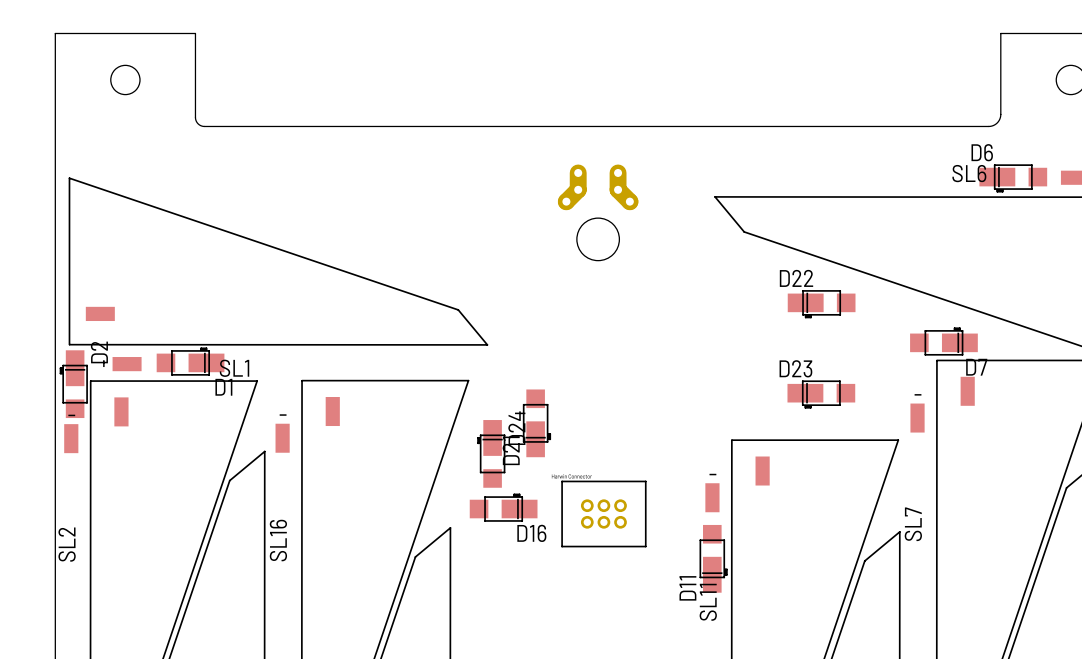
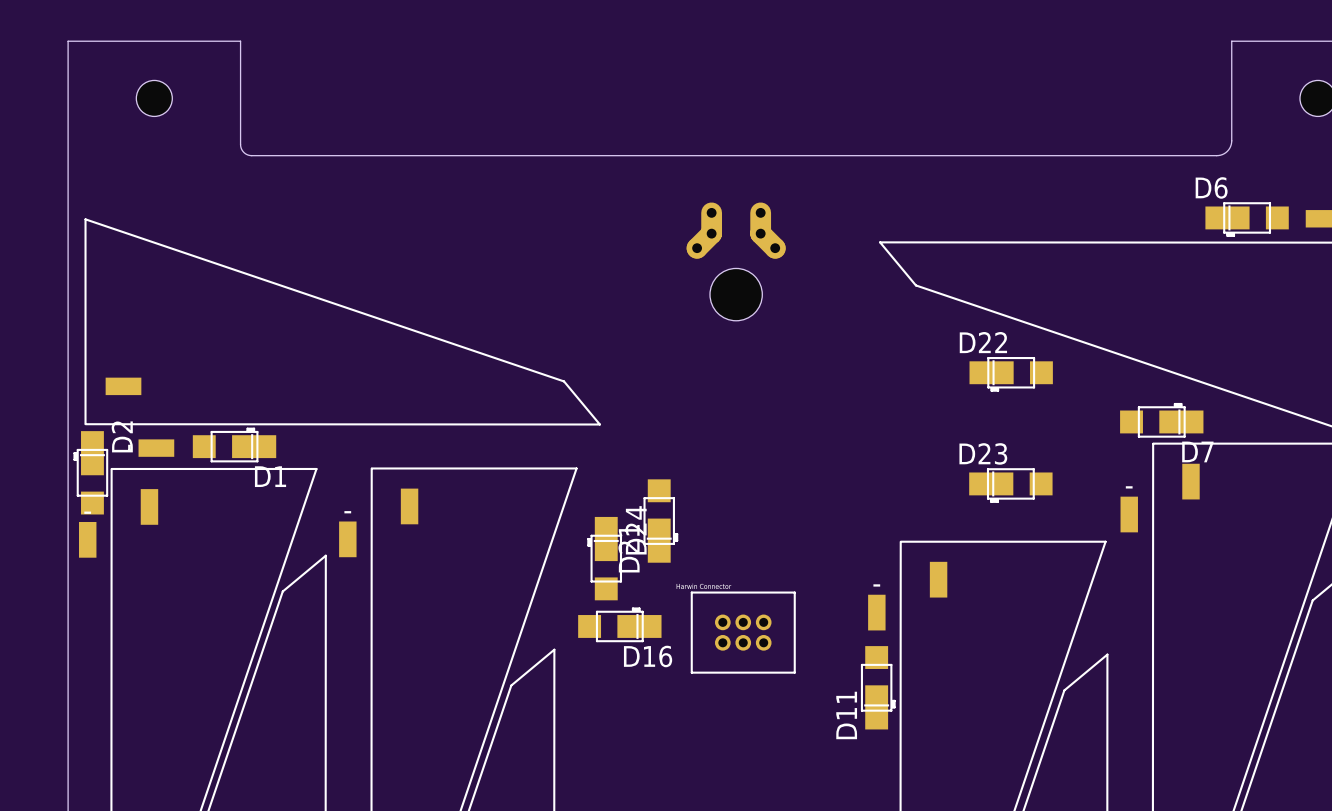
SL6 name: SL6 (969, 173) -> none
SL1 name: SL1 (234, 368) -> none
SL7 name: SL7 (913, 524) -> none
SL16 name: SL16 (278, 540) -> none
SL2 name: SL2 (67, 544) -> none
SL11 name: SL11 (708, 602) -> none

